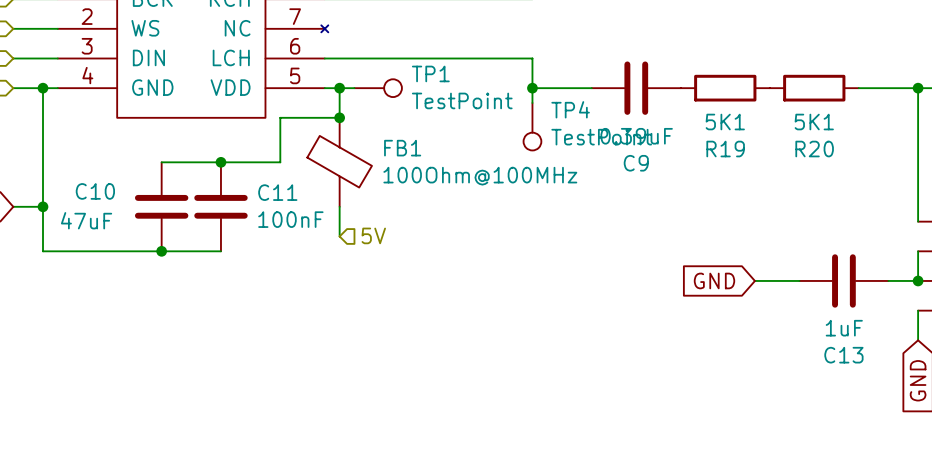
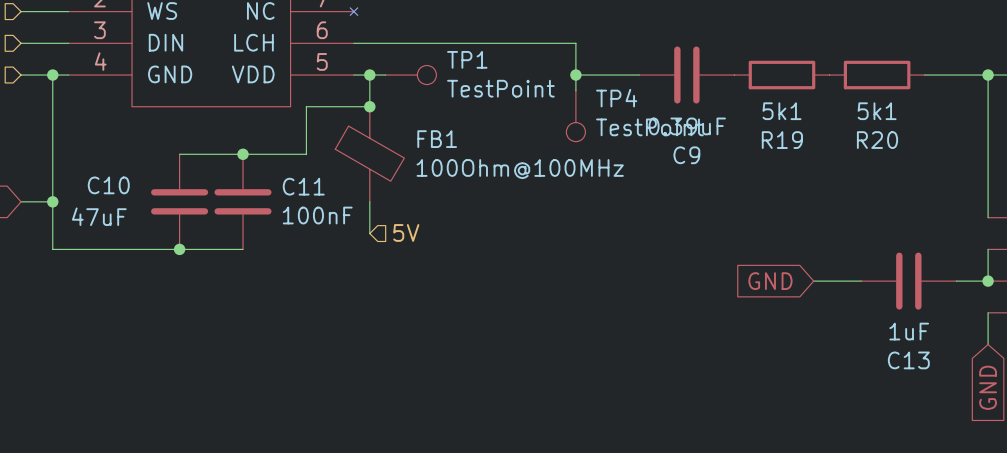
R19 value: 5K1 (725, 122) -> 5k1 (781, 111)
R20 value: 5K1 (814, 122) -> 5k1 (877, 111)

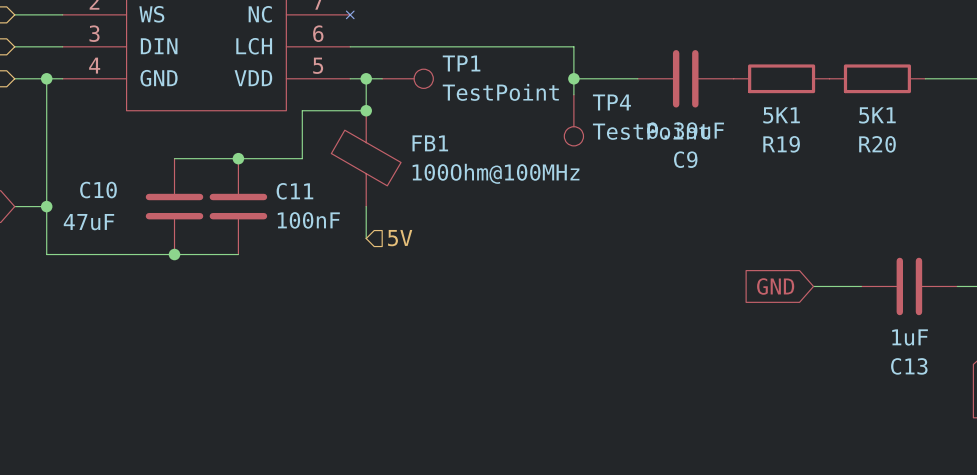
R19 value: 5k1 (781, 111) -> 5K1 (781, 115)
R20 value: 5k1 (877, 111) -> 5K1 (877, 115)

